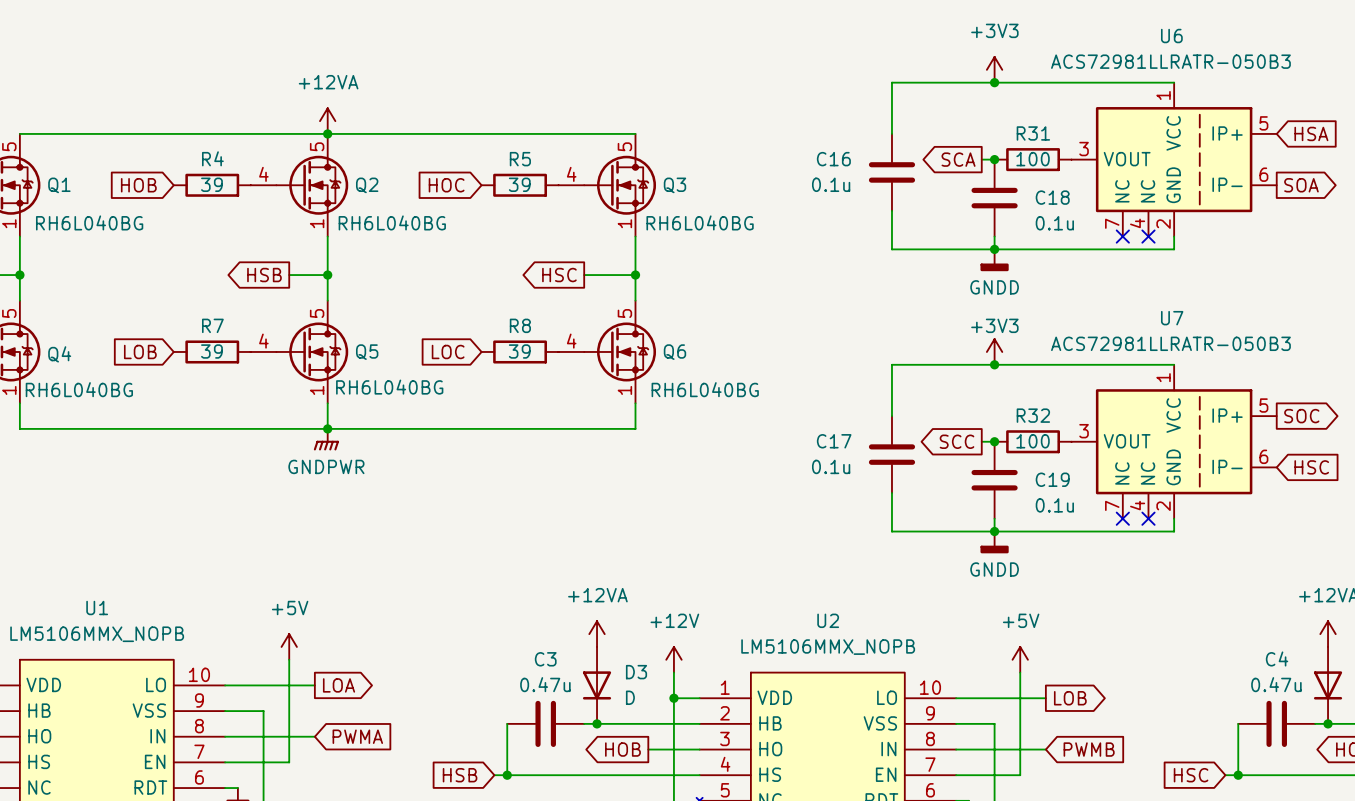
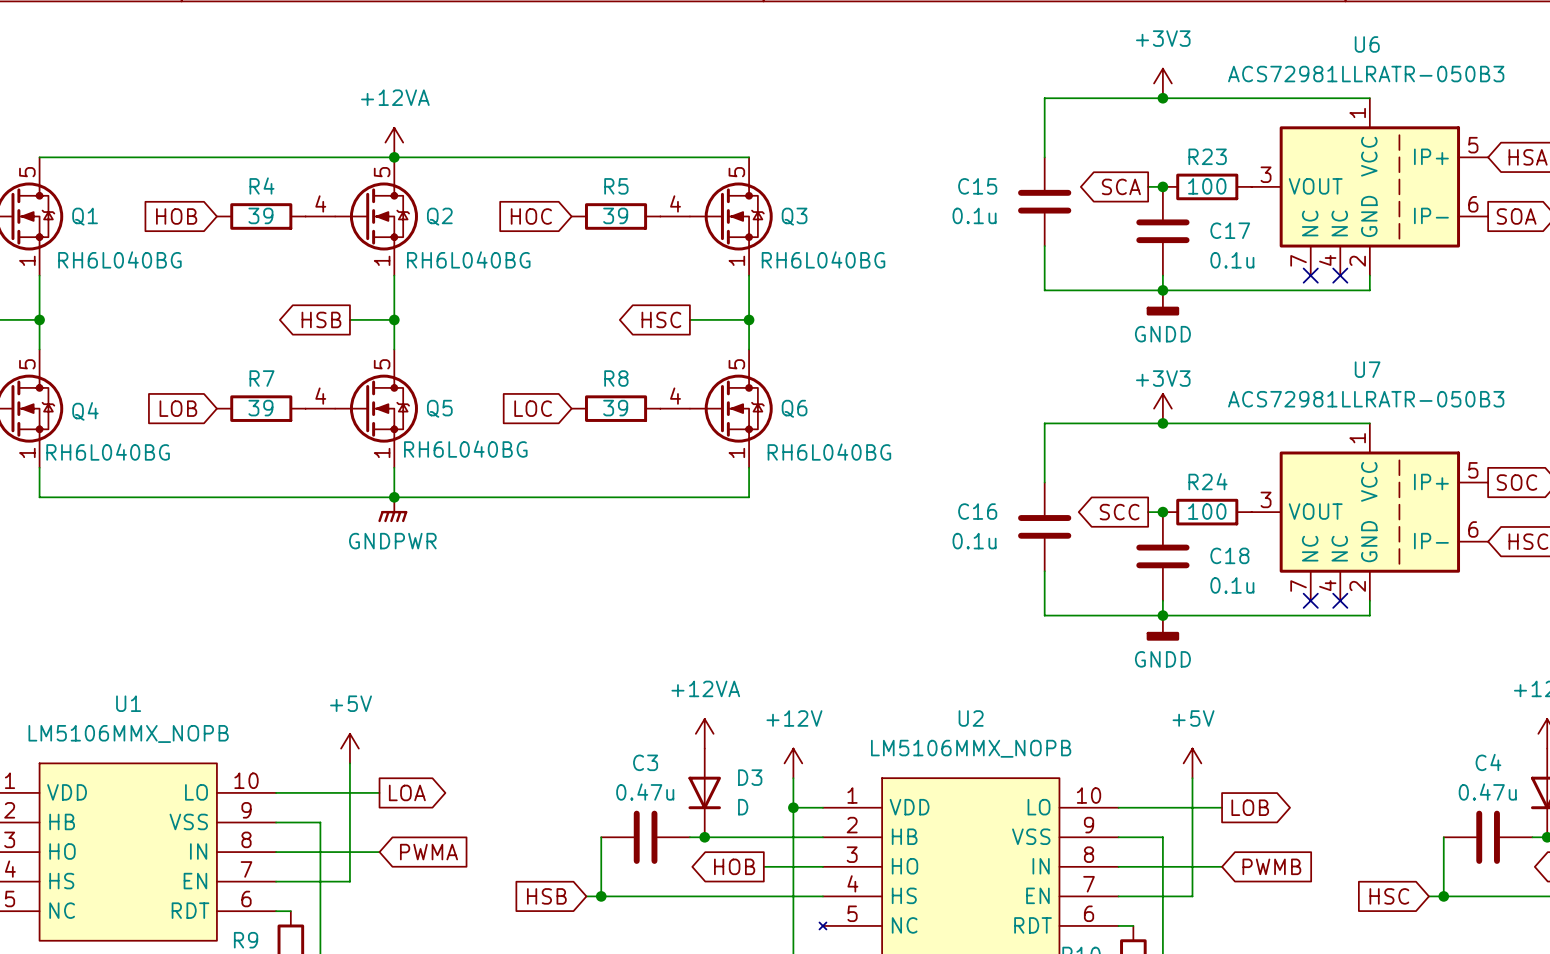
R31 name: R31 (1033, 133) -> R23 (1207, 156)
C16 name: C16 (833, 159) -> C15 (977, 186)
C18 name: C18 (1052, 197) -> C17 (1230, 230)
R32 name: R32 (1033, 415) -> R24 (1207, 481)
C17 name: C17 (834, 441) -> C16 (977, 511)
C19 name: C19 (1052, 479) -> C18 (1229, 555)

